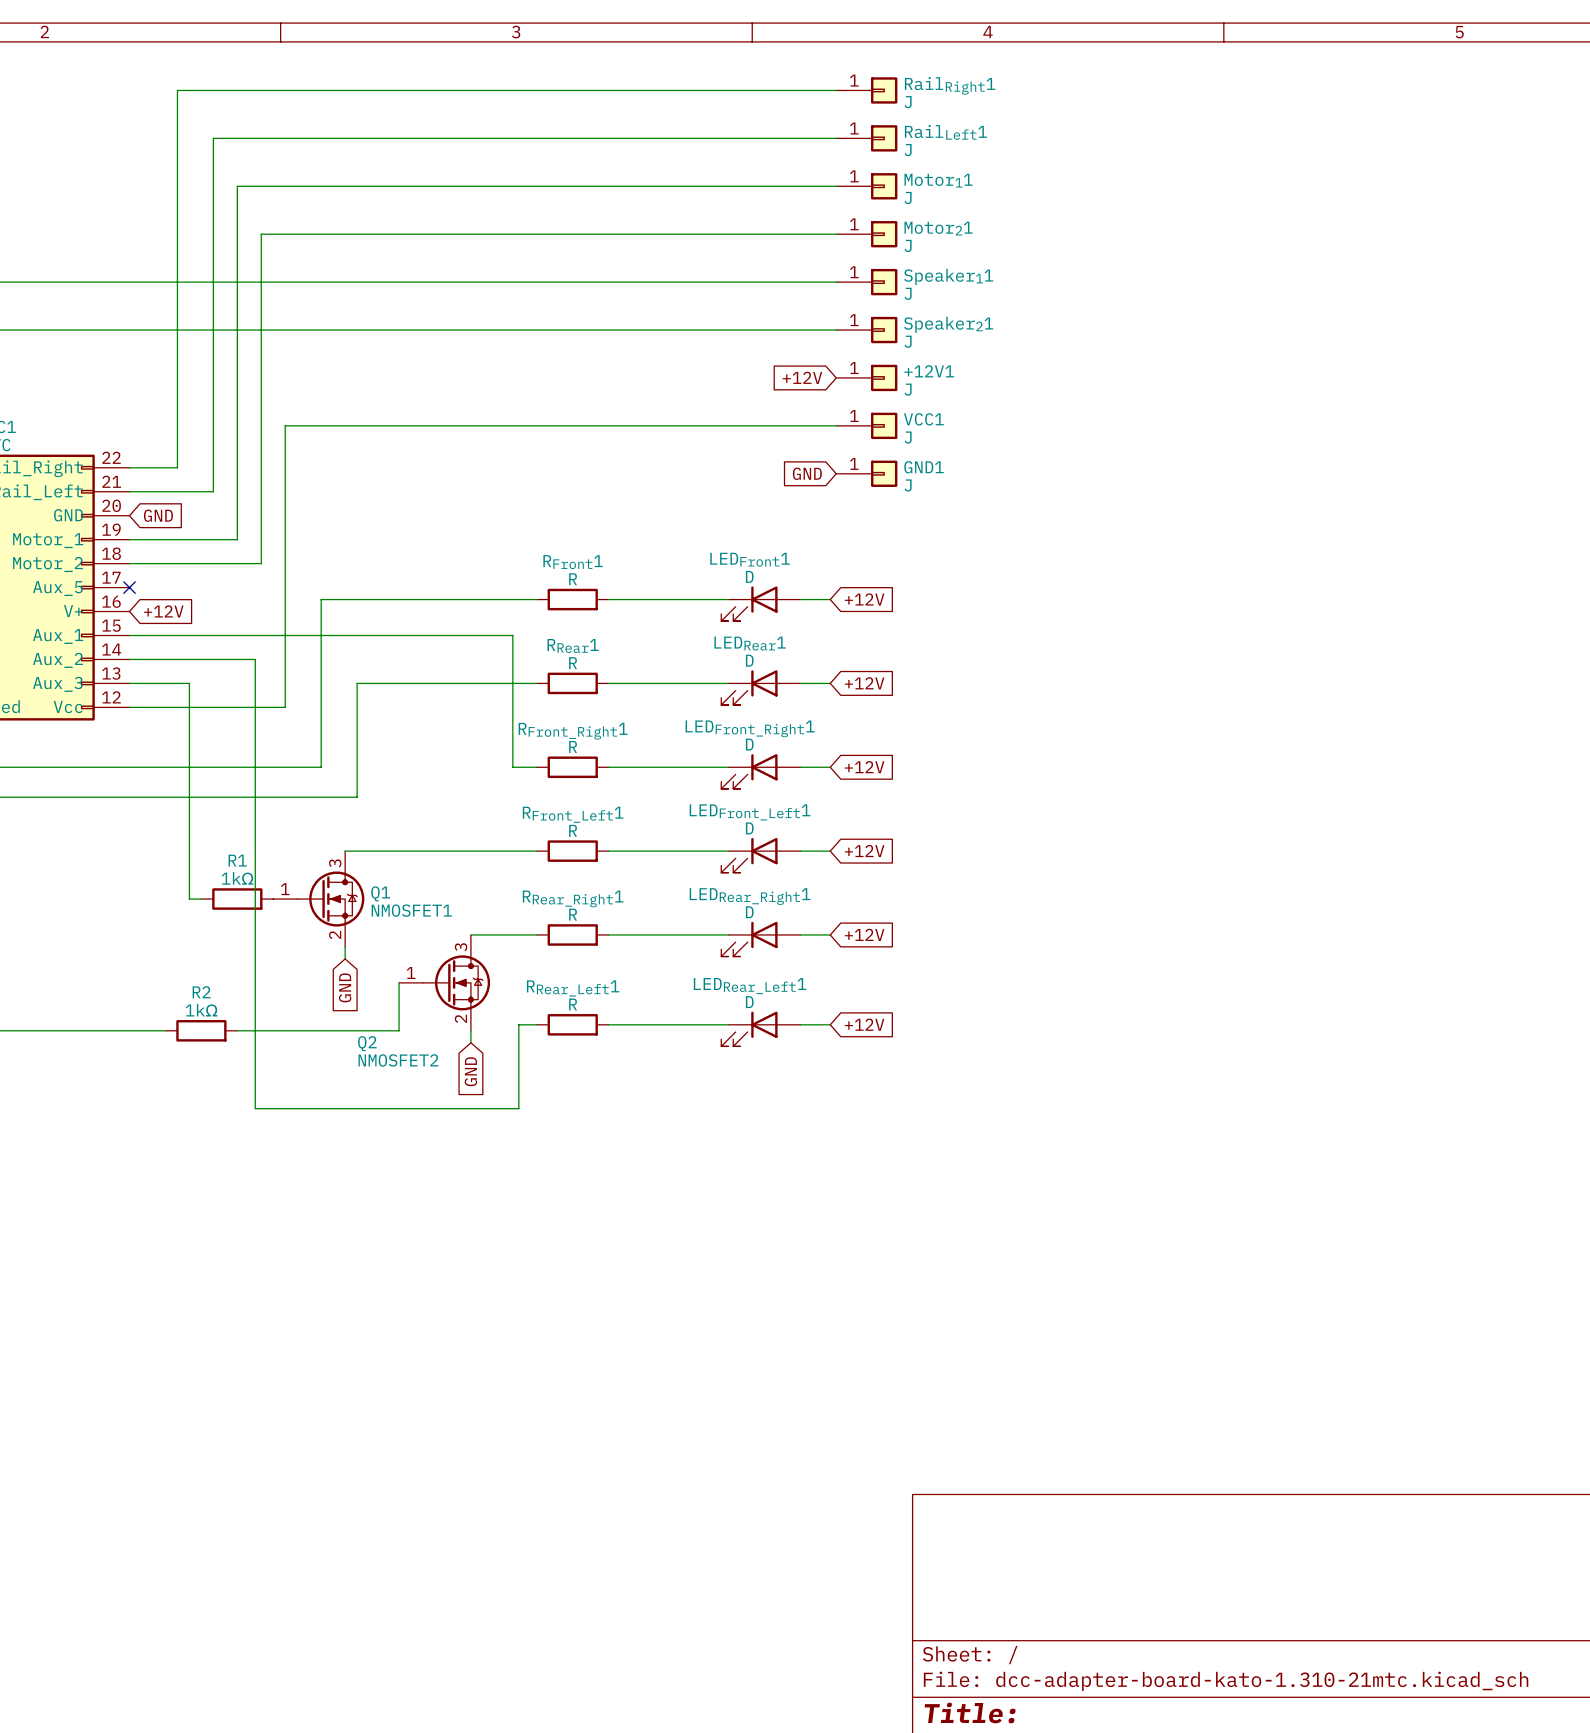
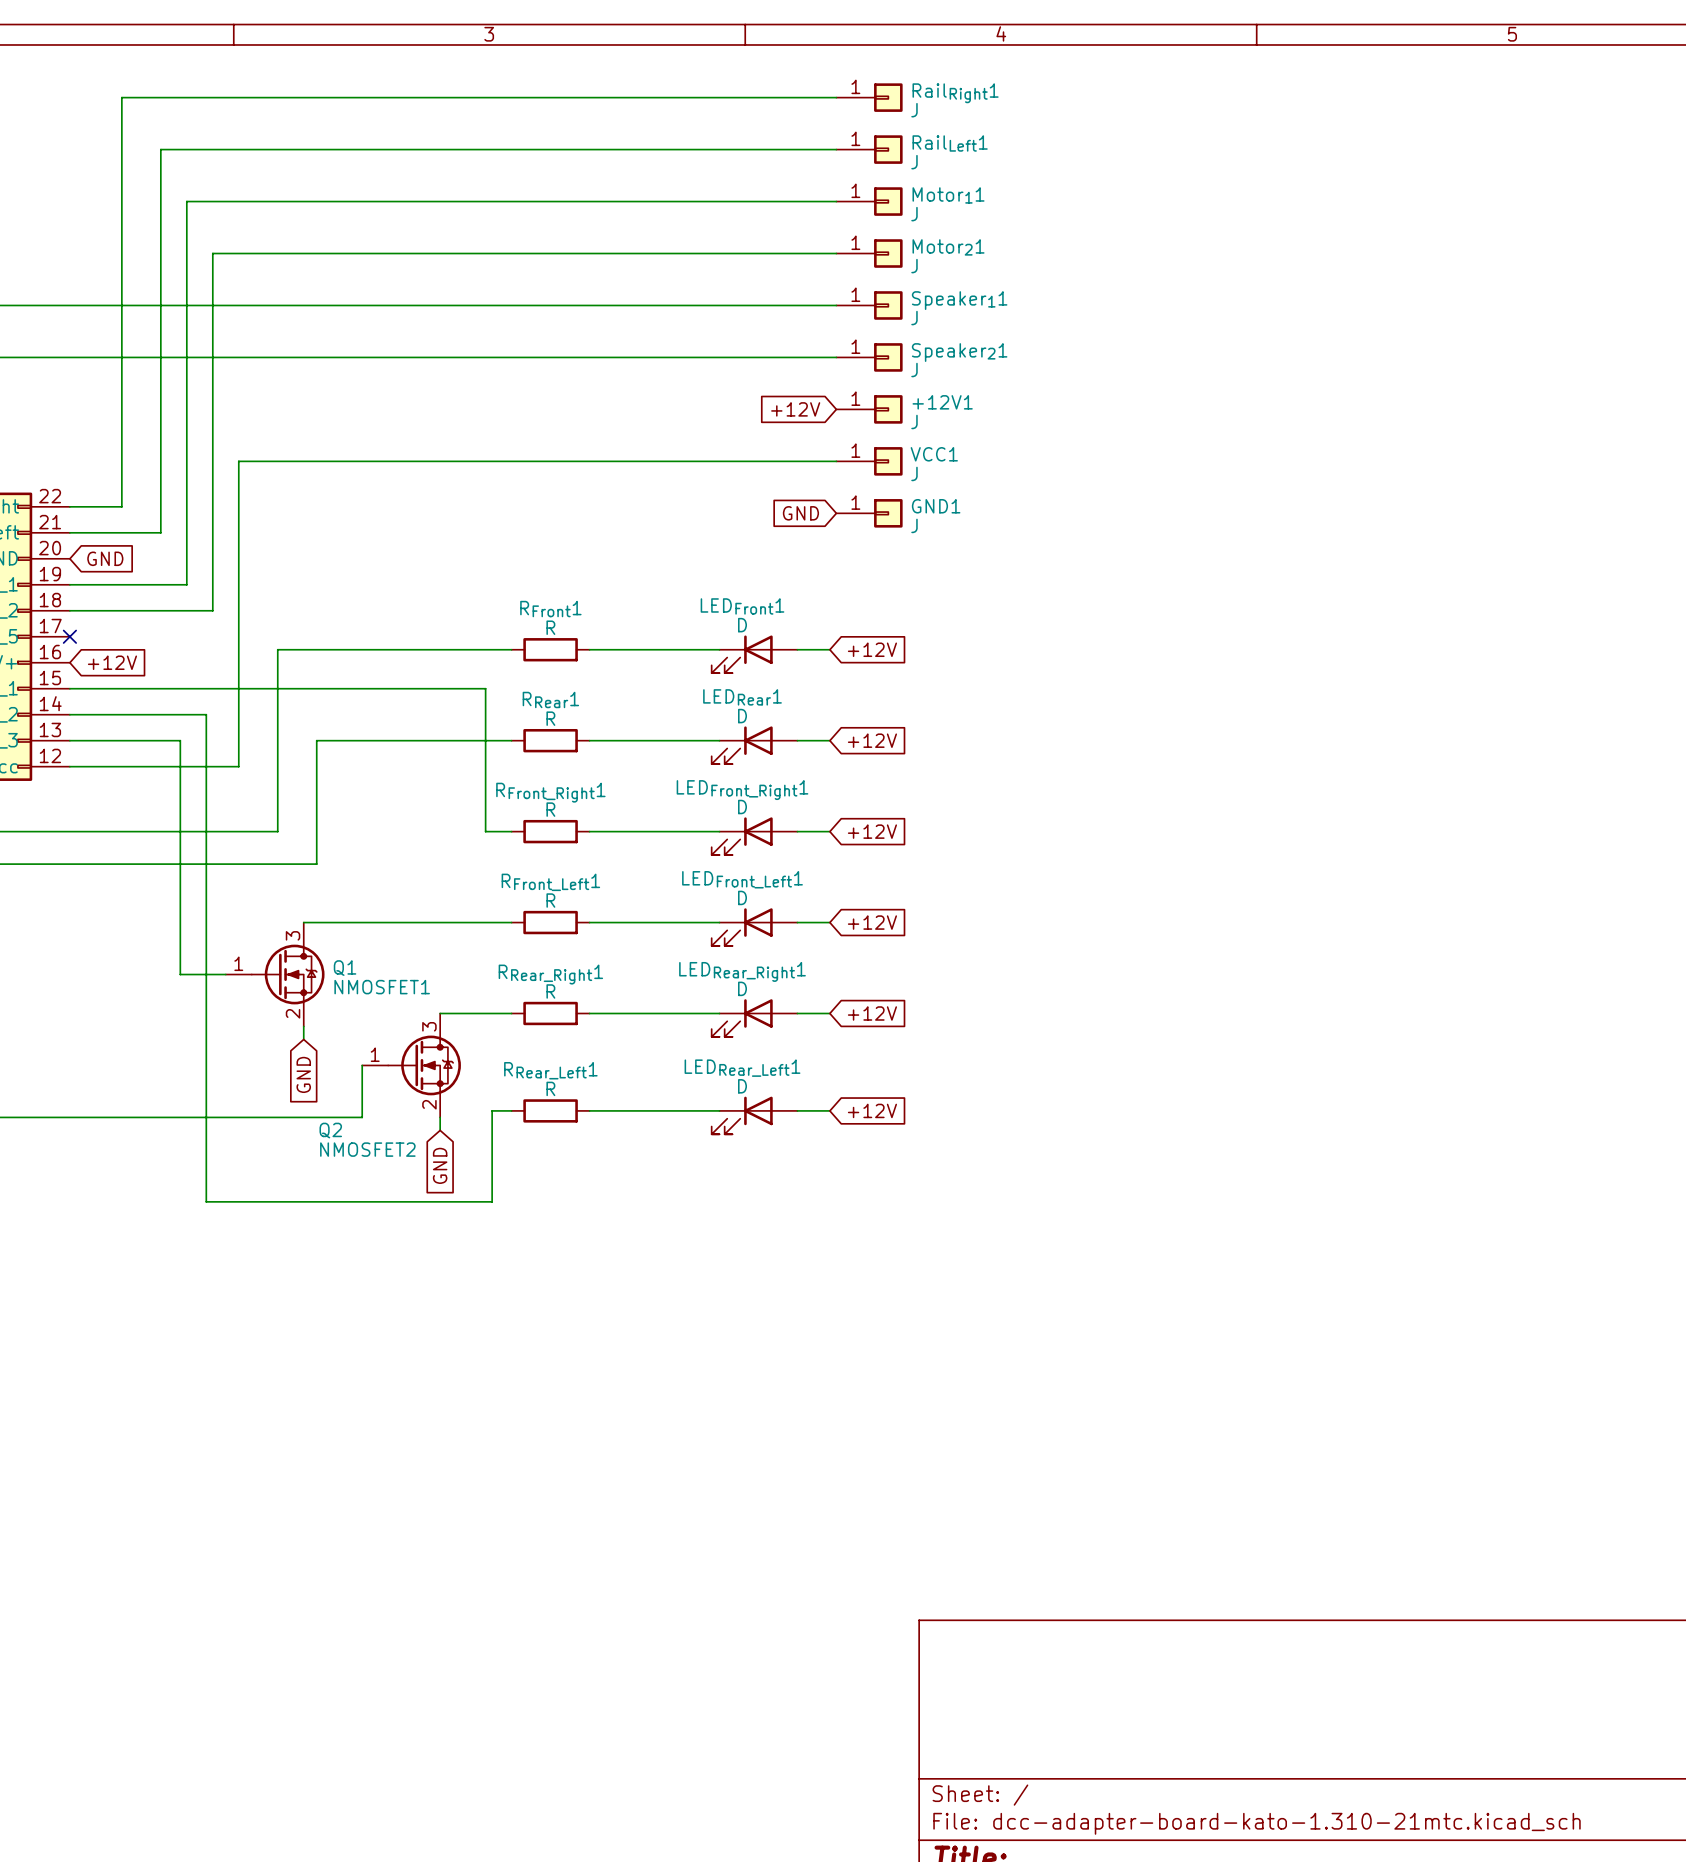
wire: (189, 683) (189, 899) (201, 899) -> (134, 740) (180, 740) (180, 974) (225, 974)
R1: 1kΩ (237, 899) -> none
wire: none -> (108, 1117) (186, 1117)
R2: 1kΩ (201, 1030) -> none

